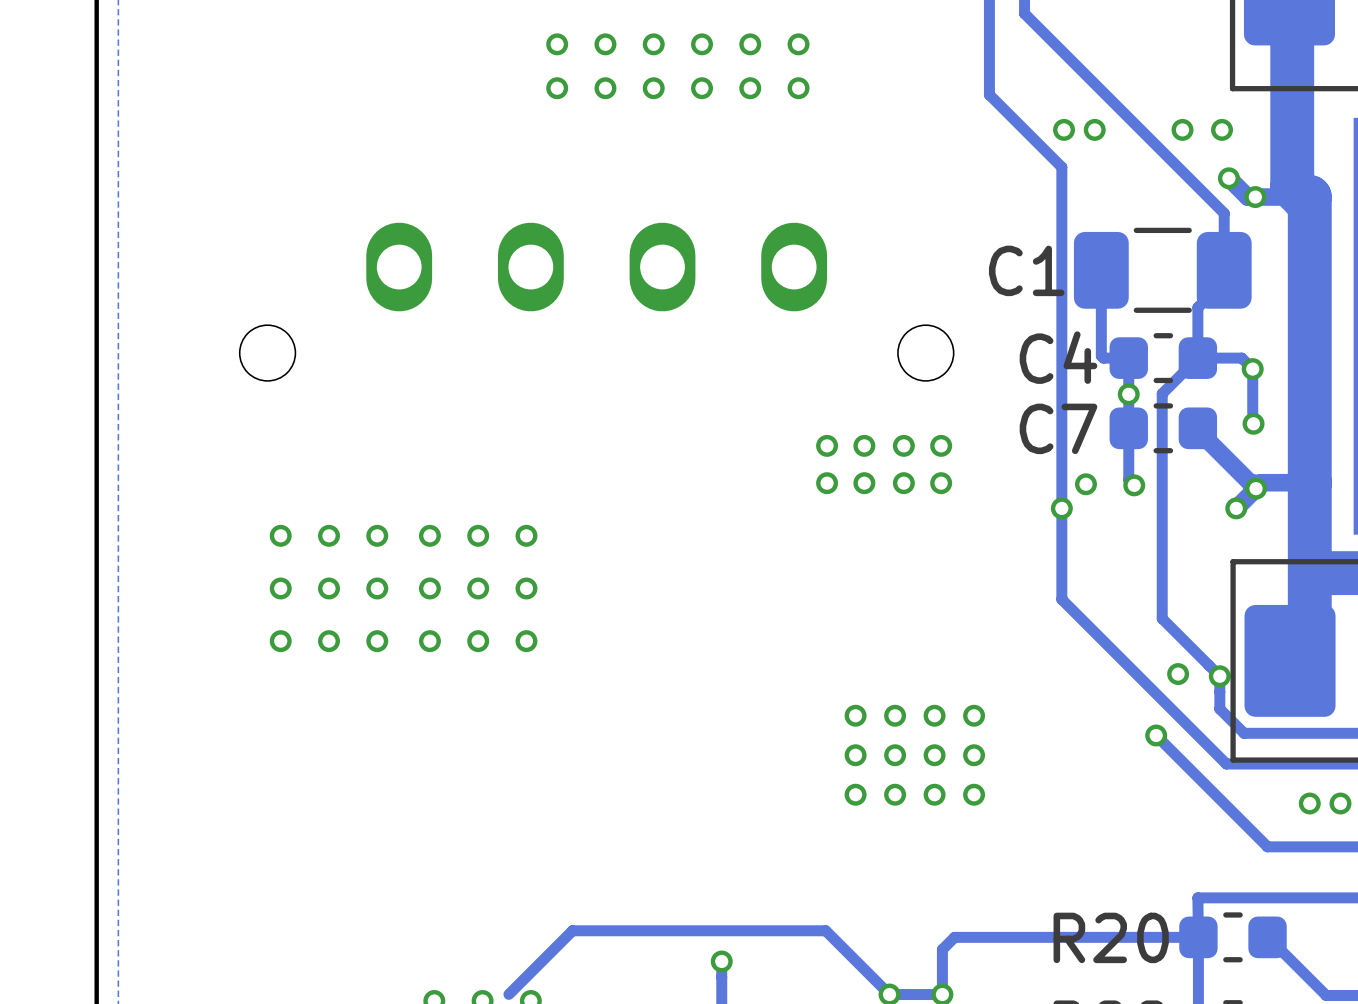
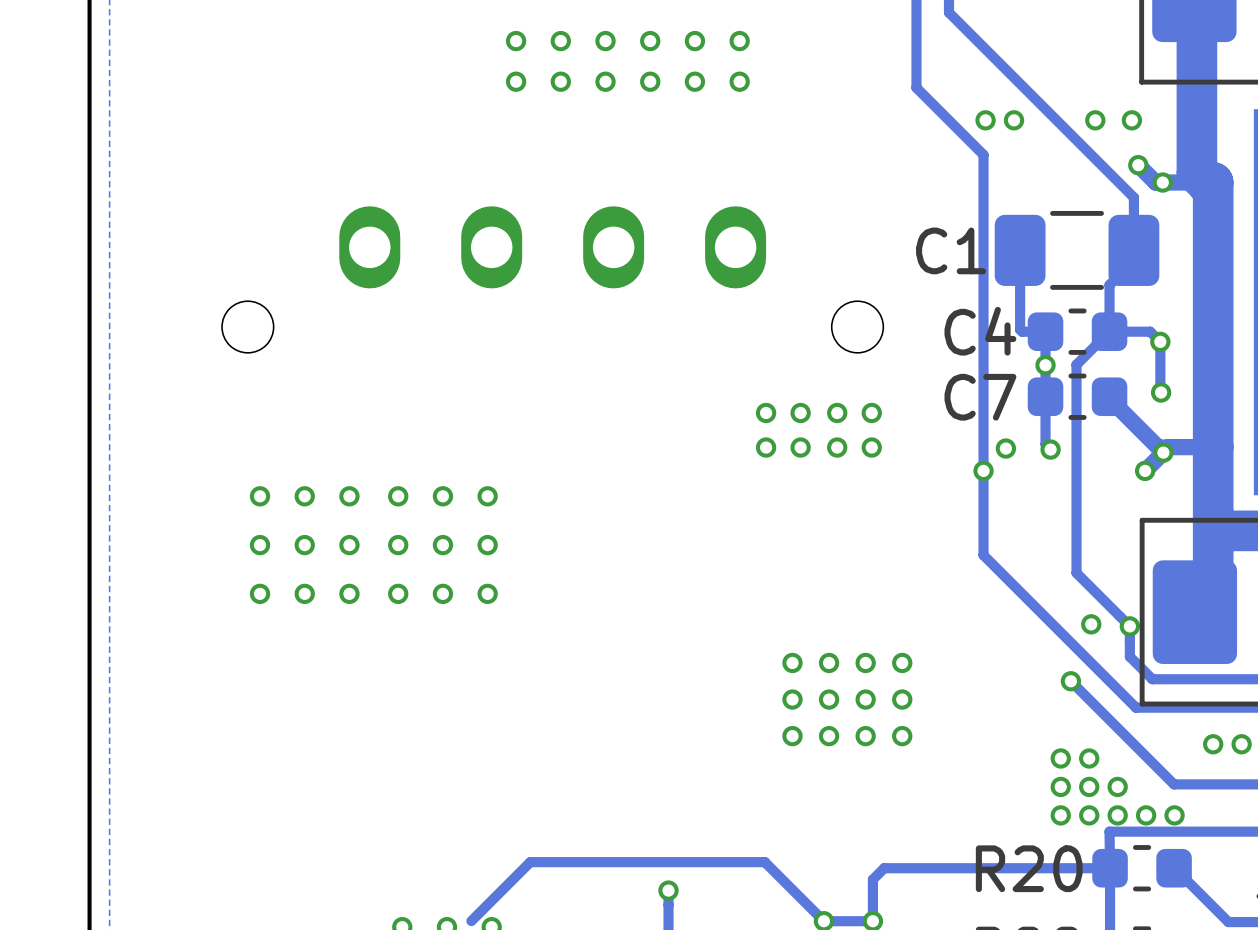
via: none -> (1060, 758)
via: none -> (1089, 758)
via: none -> (1060, 786)
via: none -> (1089, 786)
via: none -> (1117, 786)
via: none -> (1060, 815)
via: none -> (1089, 815)
via: none -> (1117, 815)
via: none -> (1146, 815)
via: none -> (1174, 815)

